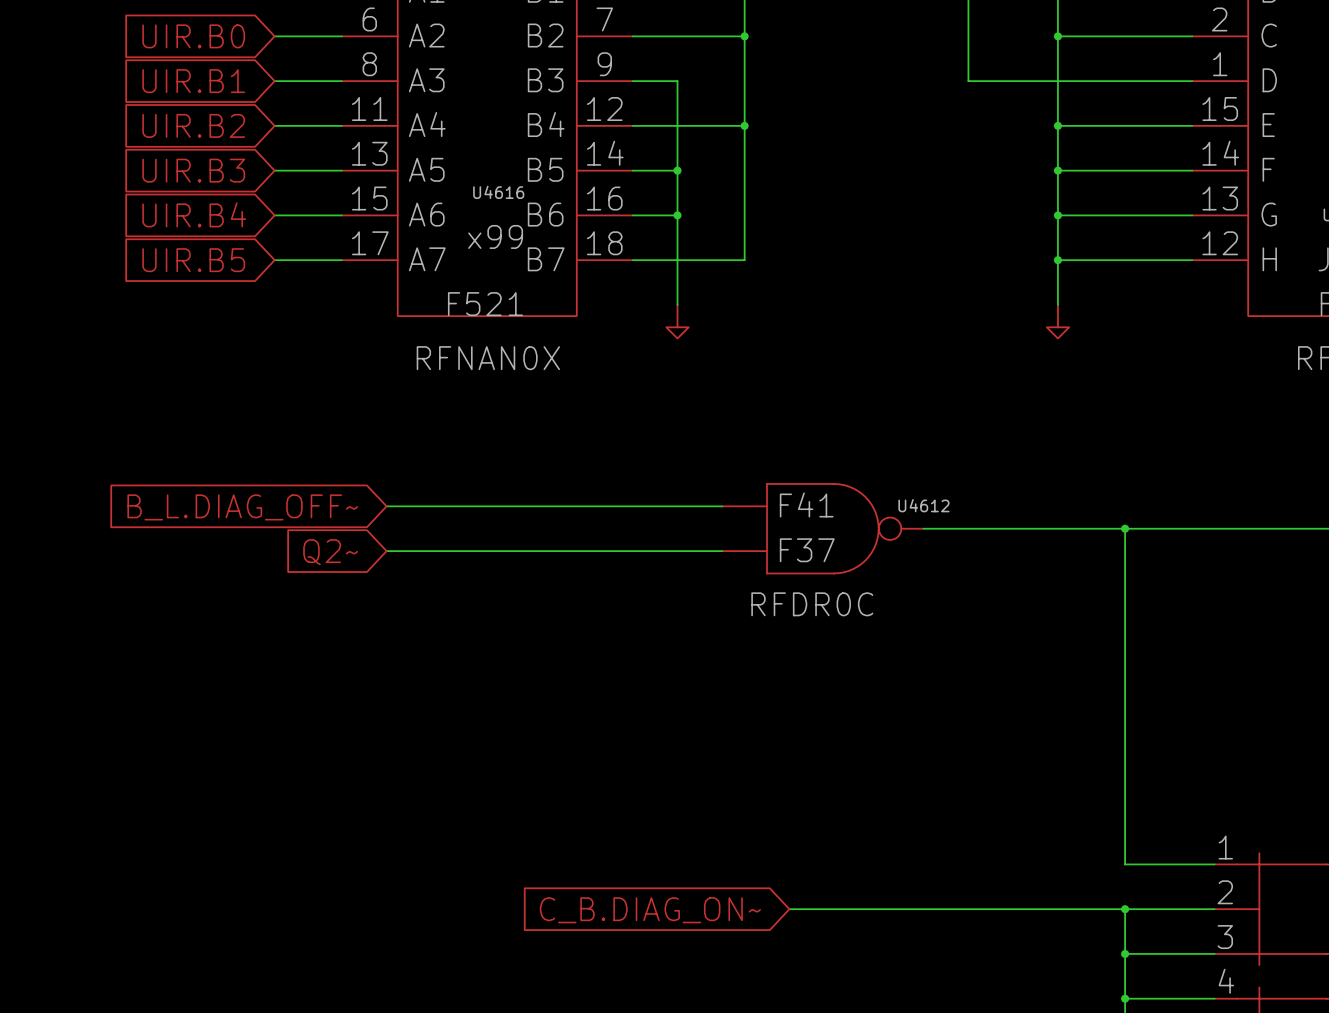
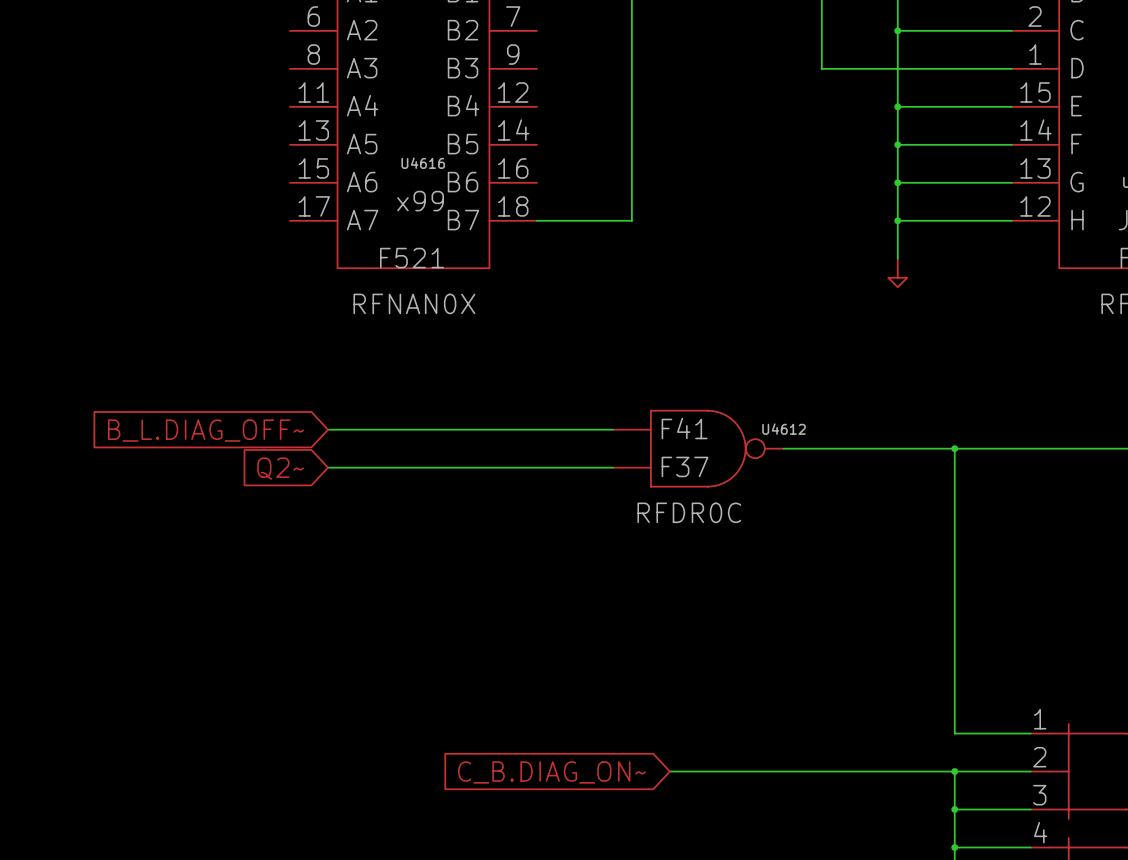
global label: UIR.B0 (193, 36) -> none
wire: (274, 36) (341, 36) -> none
wire: (632, 36) (744, 36) -> none
junction: (744, 36) -> none
global label: UIR.B1 (193, 81) -> none
wire: (274, 81) (341, 81) -> none
wire: (632, 81) (677, 81) (677, 304) -> none
global label: UIR.B2 (193, 125) -> none
wire: (274, 125) (341, 125) -> none
wire: (632, 125) (744, 125) -> none
junction: (744, 125) -> none
global label: UIR.B3 (193, 170) -> none
wire: (274, 170) (341, 170) -> none
wire: (632, 170) (677, 170) -> none
junction: (677, 170) -> none
global label: UIR.B4 (194, 214) -> none
wire: (274, 215) (341, 215) -> none
wire: (632, 215) (677, 215) -> none
junction: (677, 215) -> none
global label: UIR.B5 (193, 260) -> none
wire: (274, 260) (341, 260) -> none
power symbol: (677, 322) -> none

